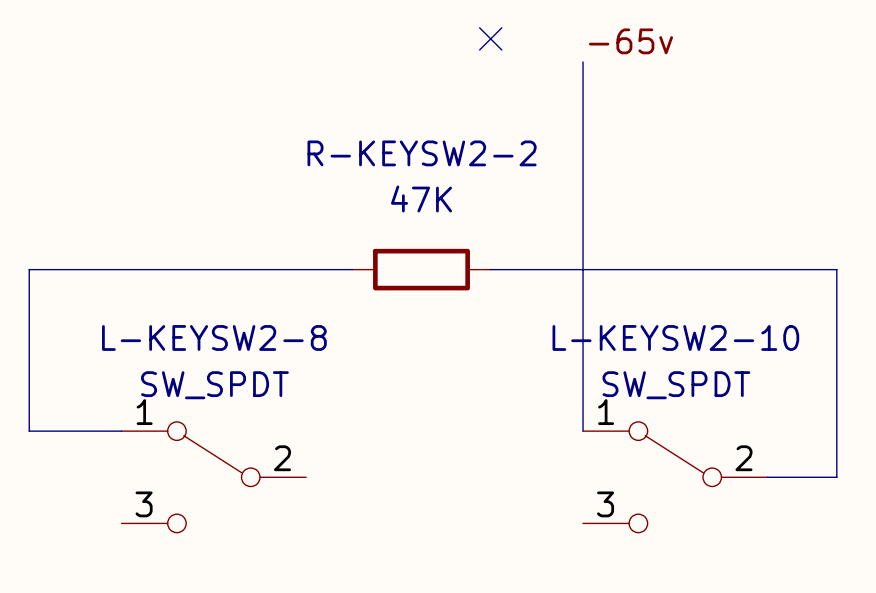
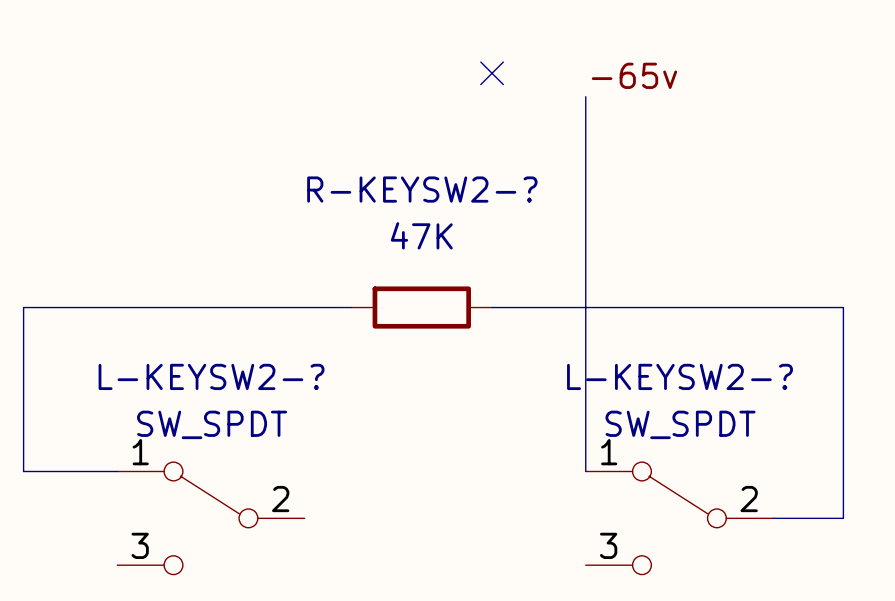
R-KEYSW2-2 name: R-KEYSW2-2 (422, 153) -> R-KEYSW2-? (422, 189)
L-KEYSW2-8 name: L-KEYSW2-8 (214, 337) -> L-KEYSW2-? (211, 376)
L-KEYSW2-10 name: L-KEYSW2-10 (675, 337) -> L-KEYSW2-? (680, 376)

